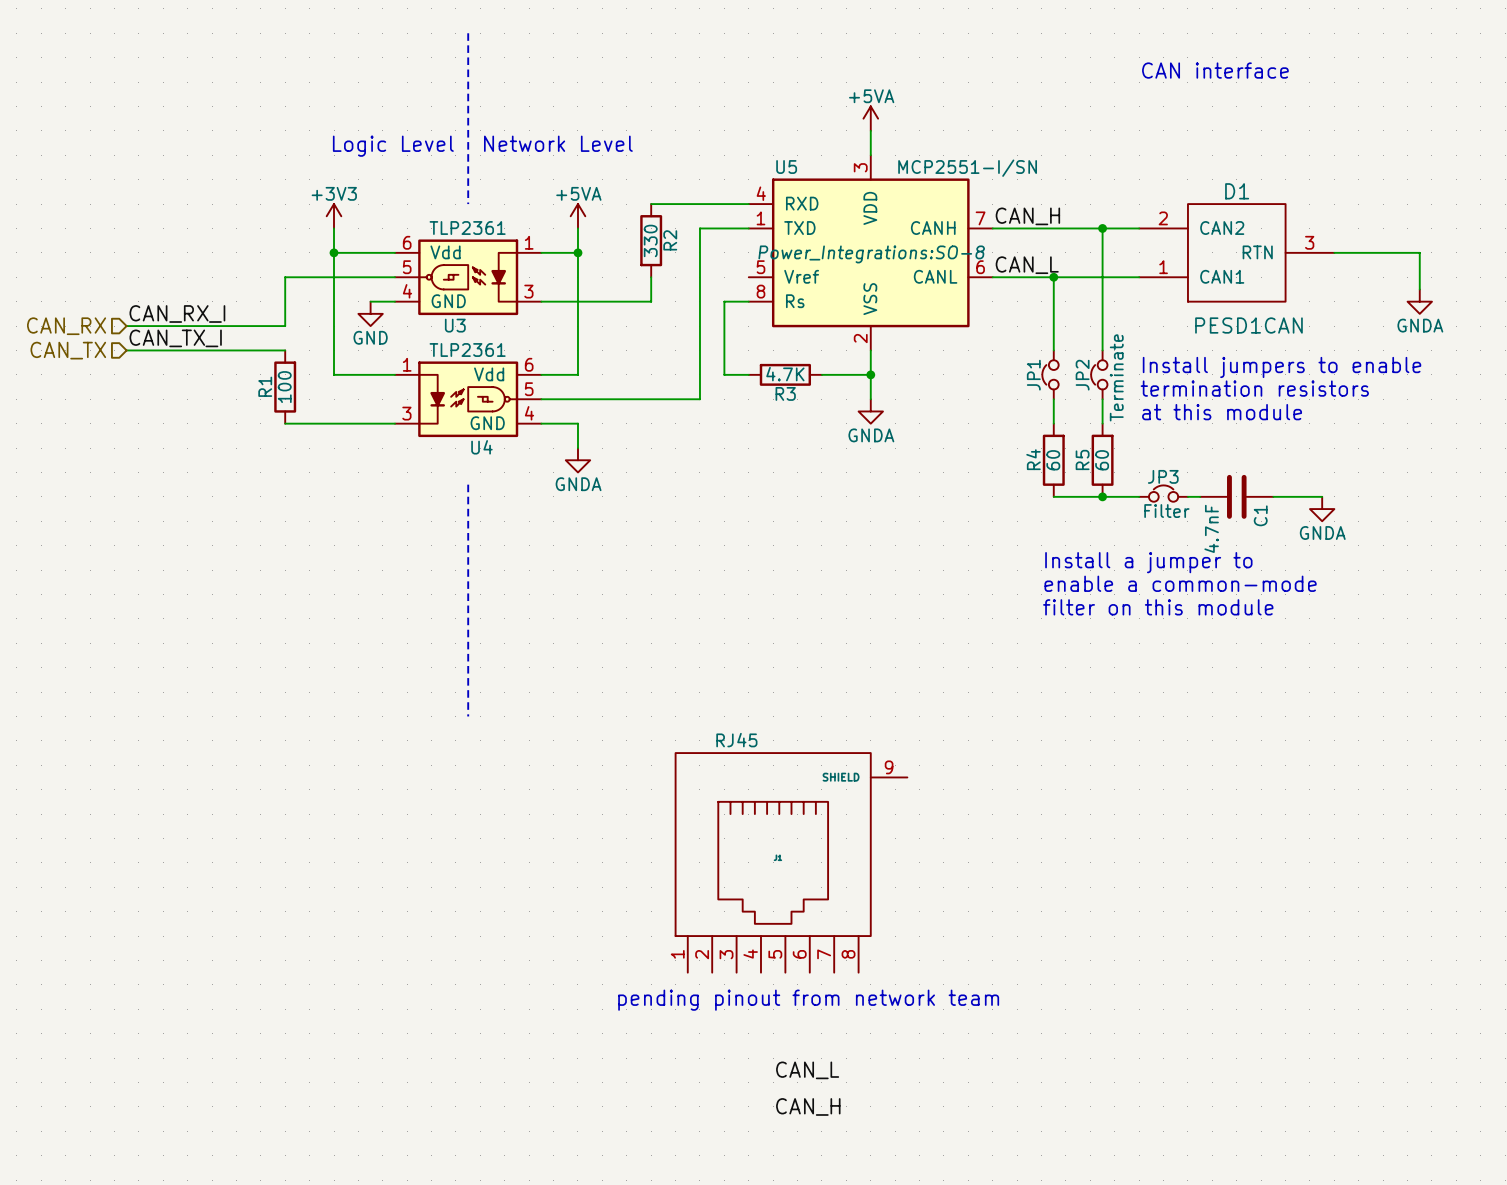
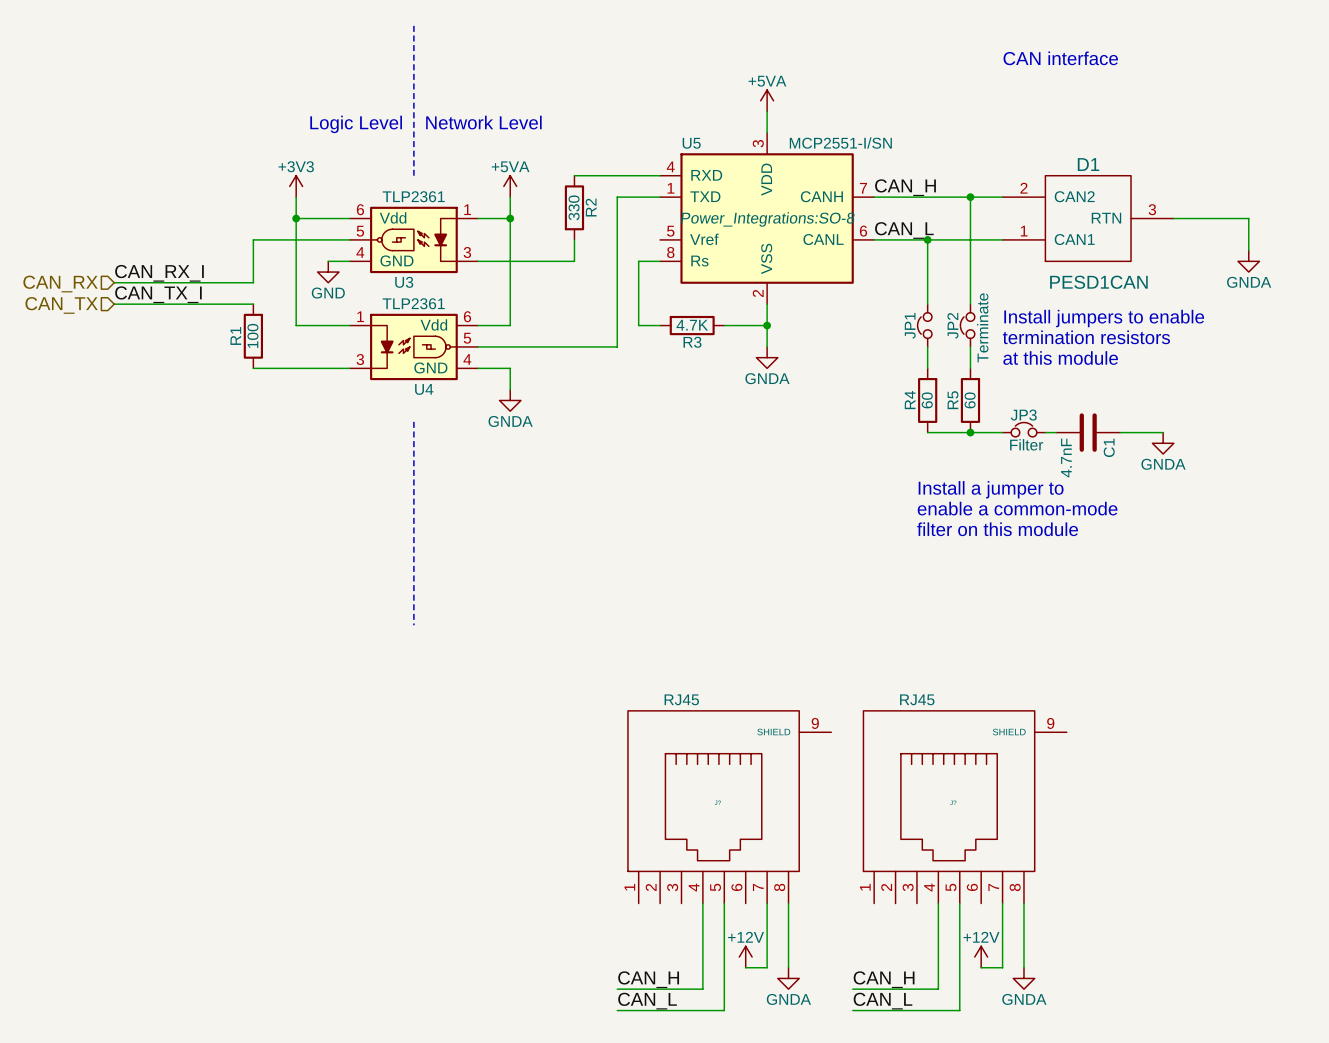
part: RJ45 (791, 862) -> none
part: none -> RJ45 (729, 807)
part: none -> RJ45 (965, 807)
text: pending pinout from network team (808, 1000) -> none
wire: none -> (702, 903) (702, 989) (617, 989)
wire: none -> (724, 903) (724, 1010) (617, 1010)
wire: none -> (767, 903) (767, 967) (745, 967)
wire: none -> (788, 903) (788, 967)
wire: none -> (938, 903) (938, 989) (852, 989)
wire: none -> (959, 903) (959, 1010) (852, 1010)
wire: none -> (1002, 903) (1002, 967) (981, 967)
wire: none -> (1023, 903) (1023, 967)
label position: CAN_L (807, 1070) -> CAN_L (647, 1001)
power symbol: none -> +12V (745, 957)
power symbol: none -> +12V (981, 957)
label position: CAN_H (808, 1106) -> CAN_H (648, 979)
power symbol: none -> GNDA (788, 978)
label: none -> CAN_H (884, 979)
power symbol: none -> GNDA (1023, 978)
label: none -> CAN_L (882, 1001)

